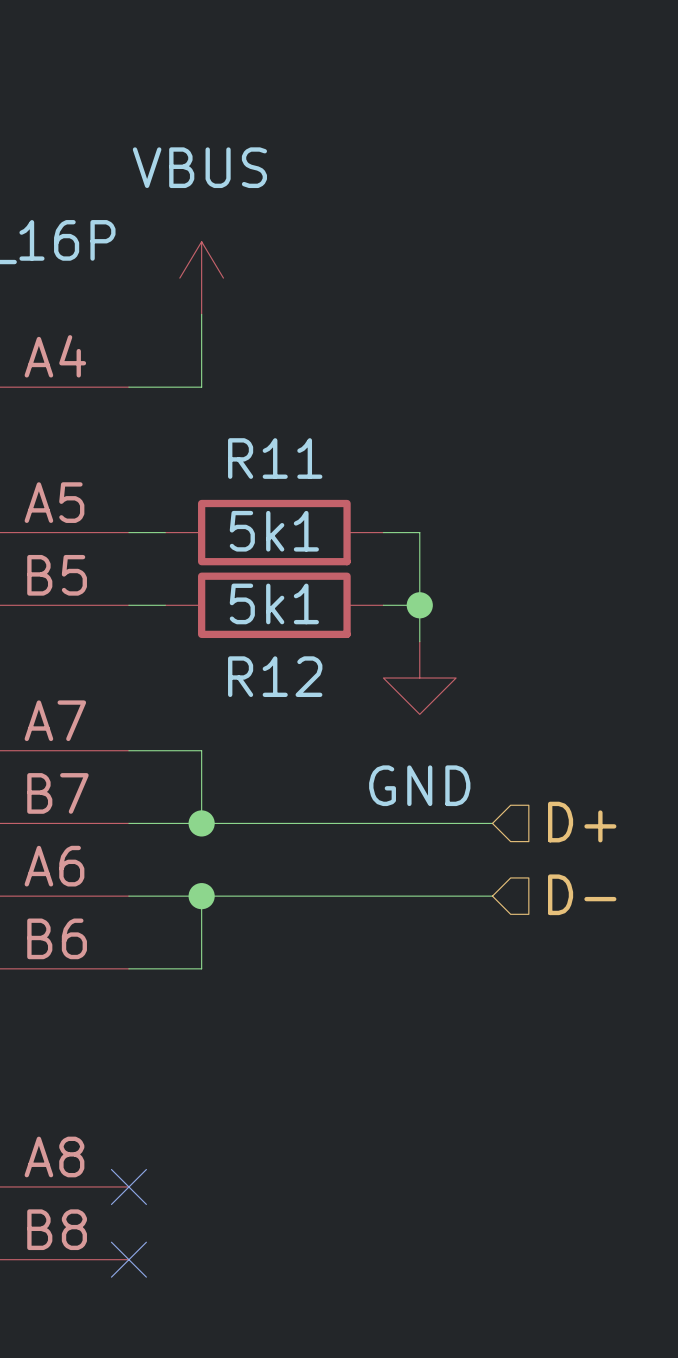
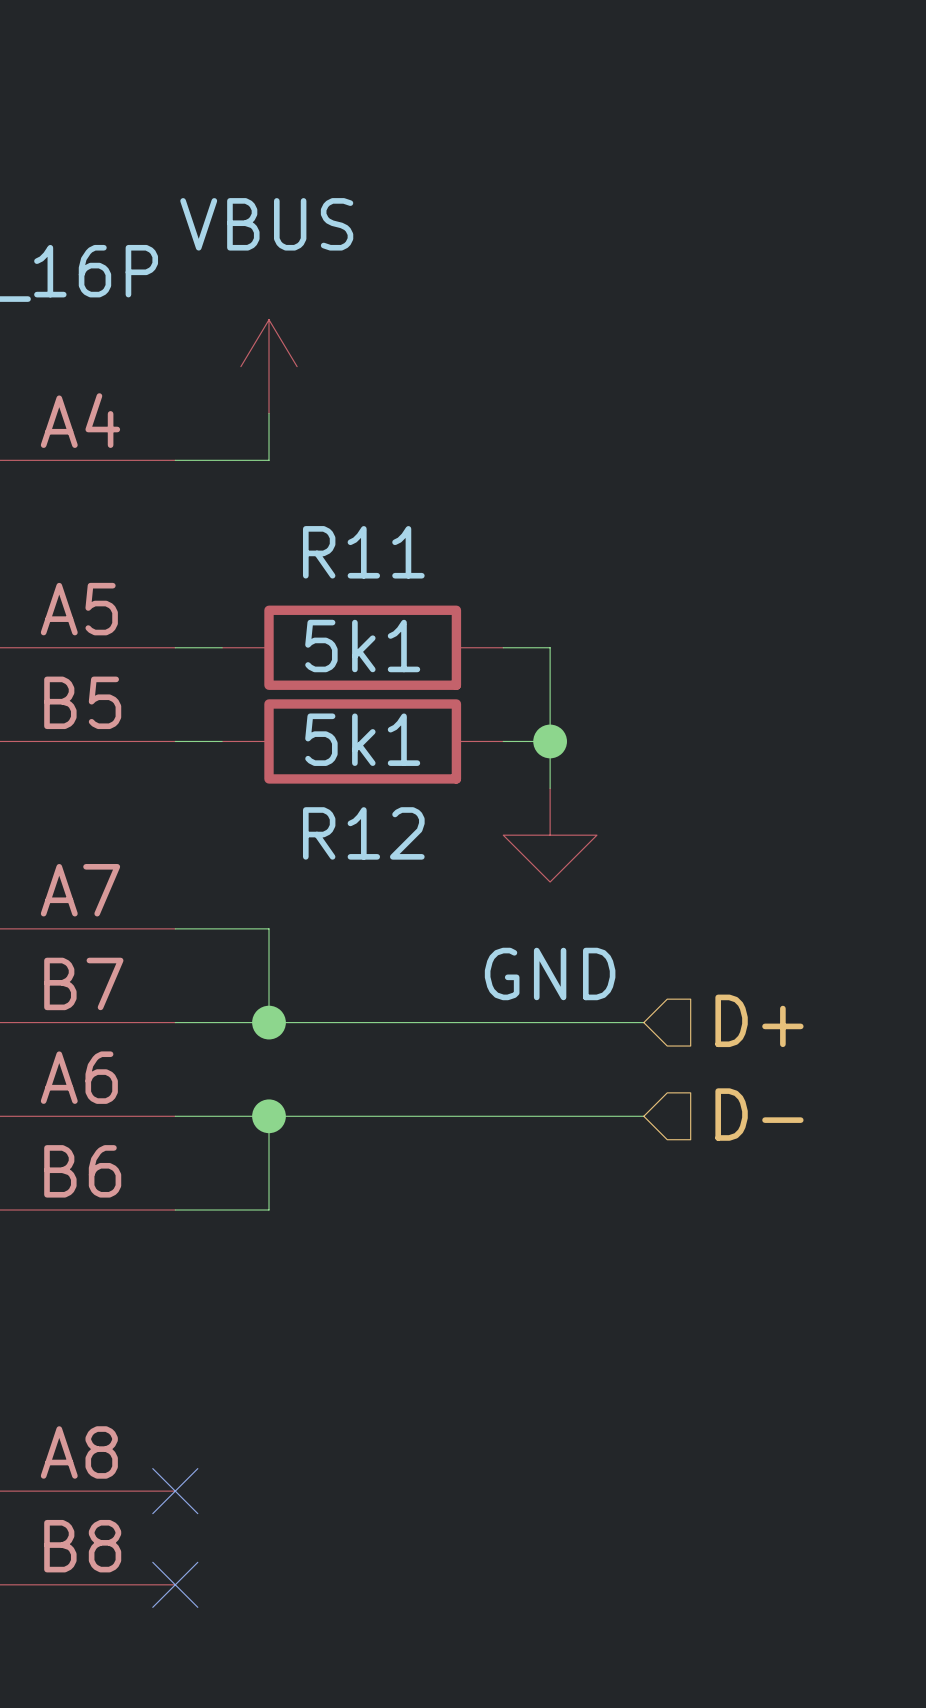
power symbol position: VBUS (201, 278) -> VBUS (269, 366)

